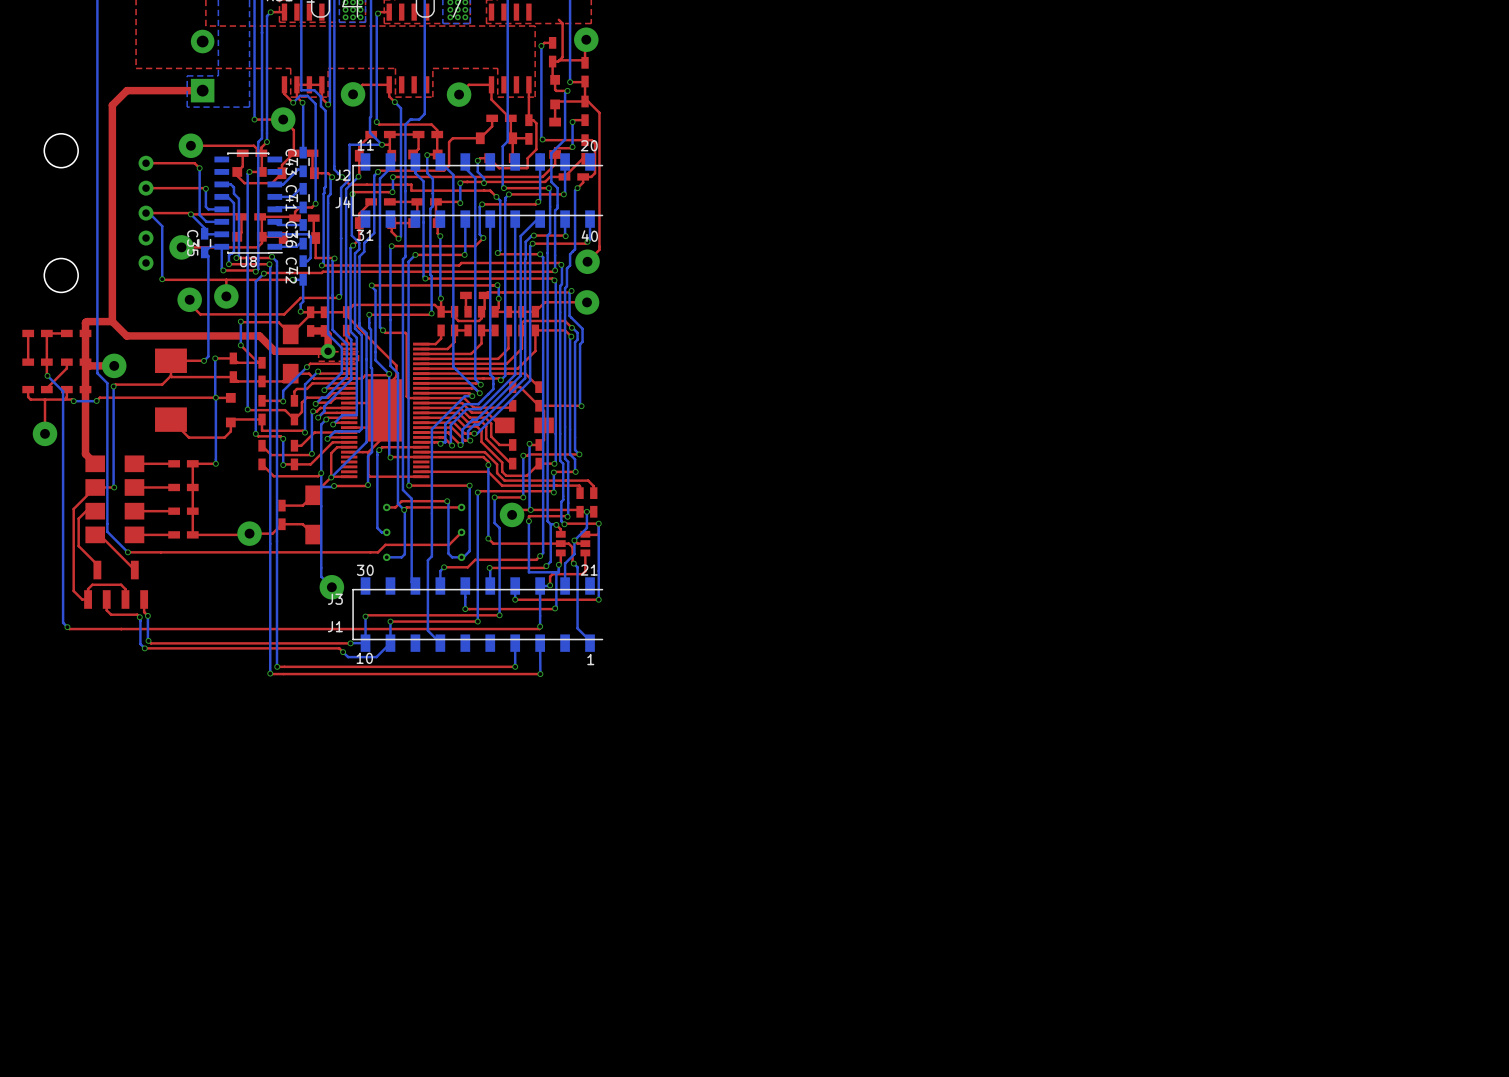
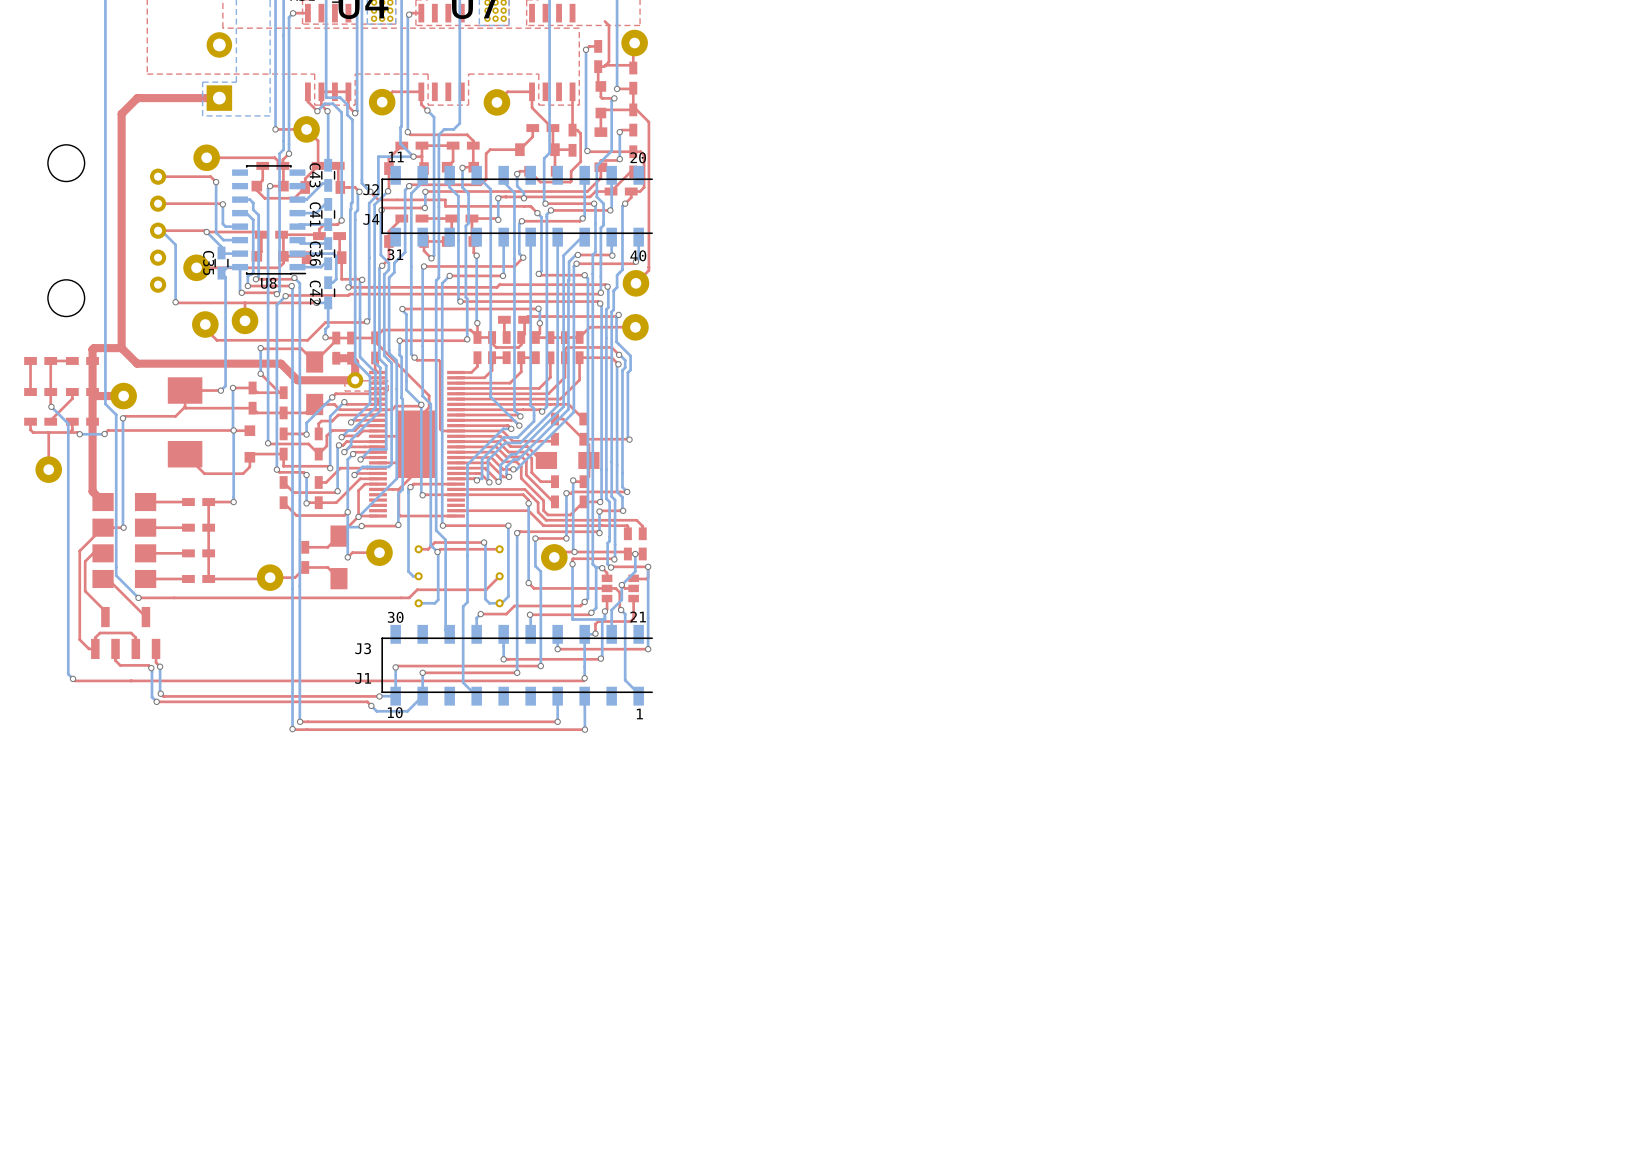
top track: none -> (379, 552) (352, 552) (347, 557)
bottom track: (321, 514) (321, 576) (331, 587) -> none
via: none -> (347, 557)
part position: (331, 587) -> (379, 552)

